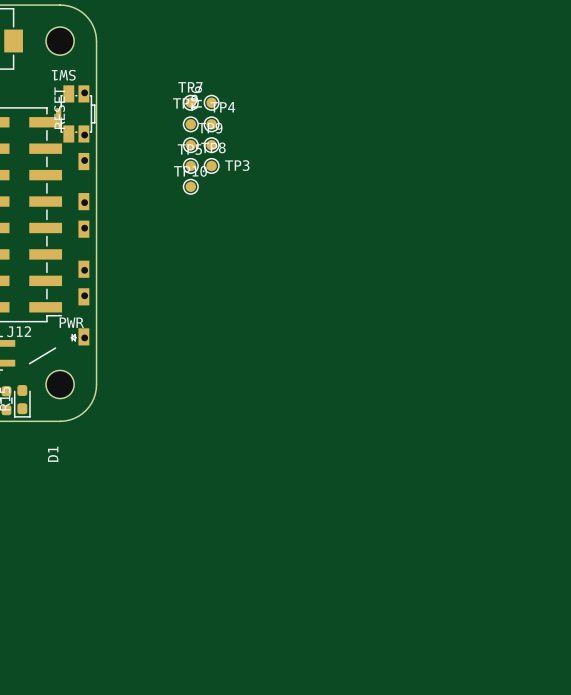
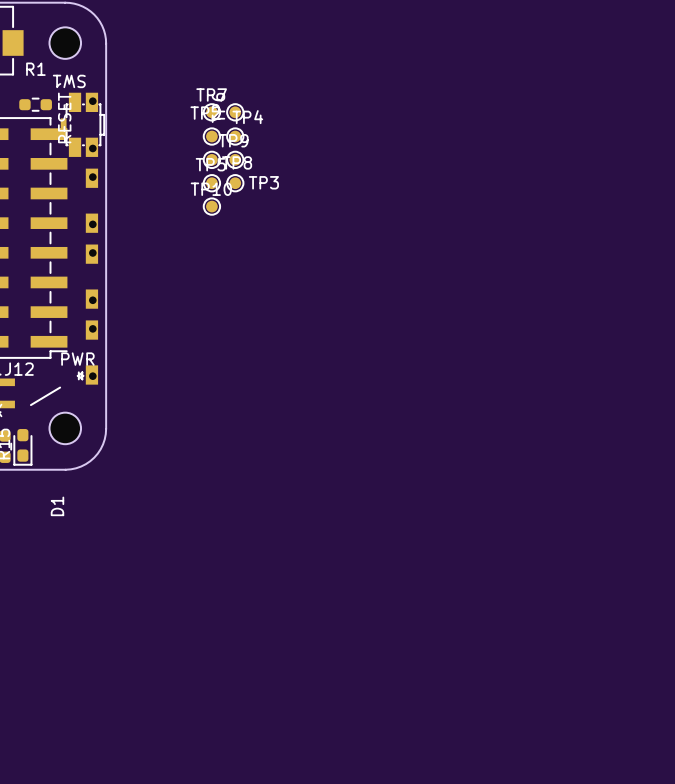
R1: none -> (35, 104)

